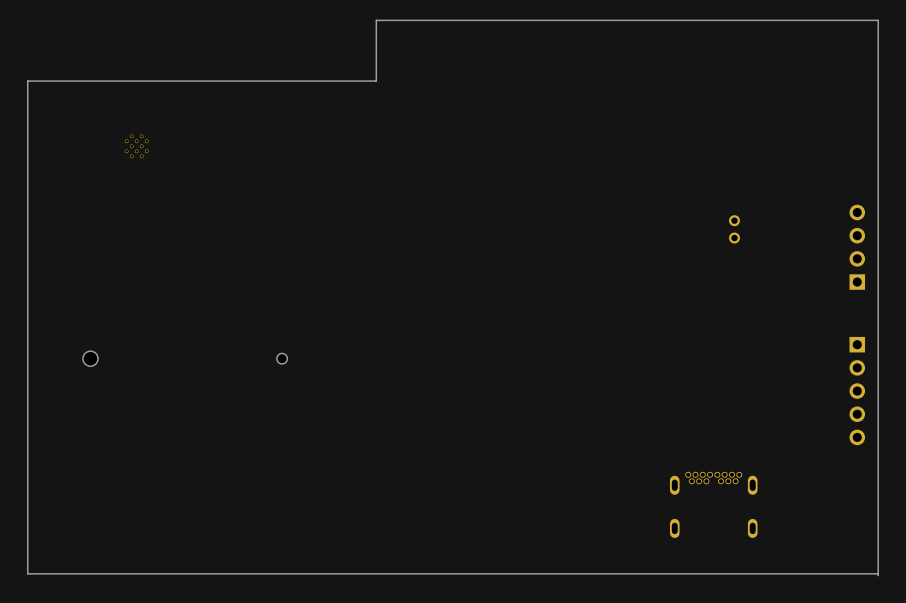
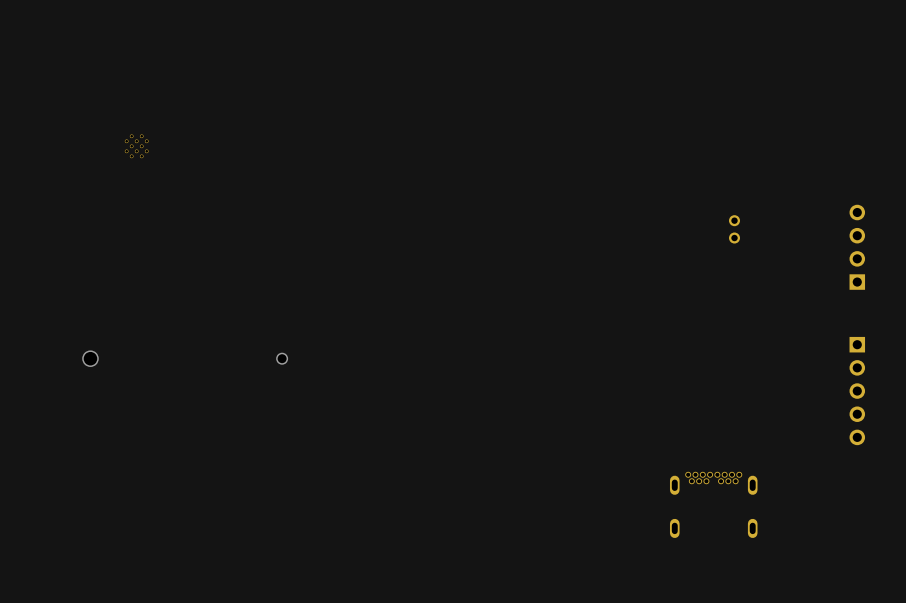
board edge: (878, 573) (27, 573) (27, 81) (376, 81) (376, 20) (878, 20) (878, 575) -> none

